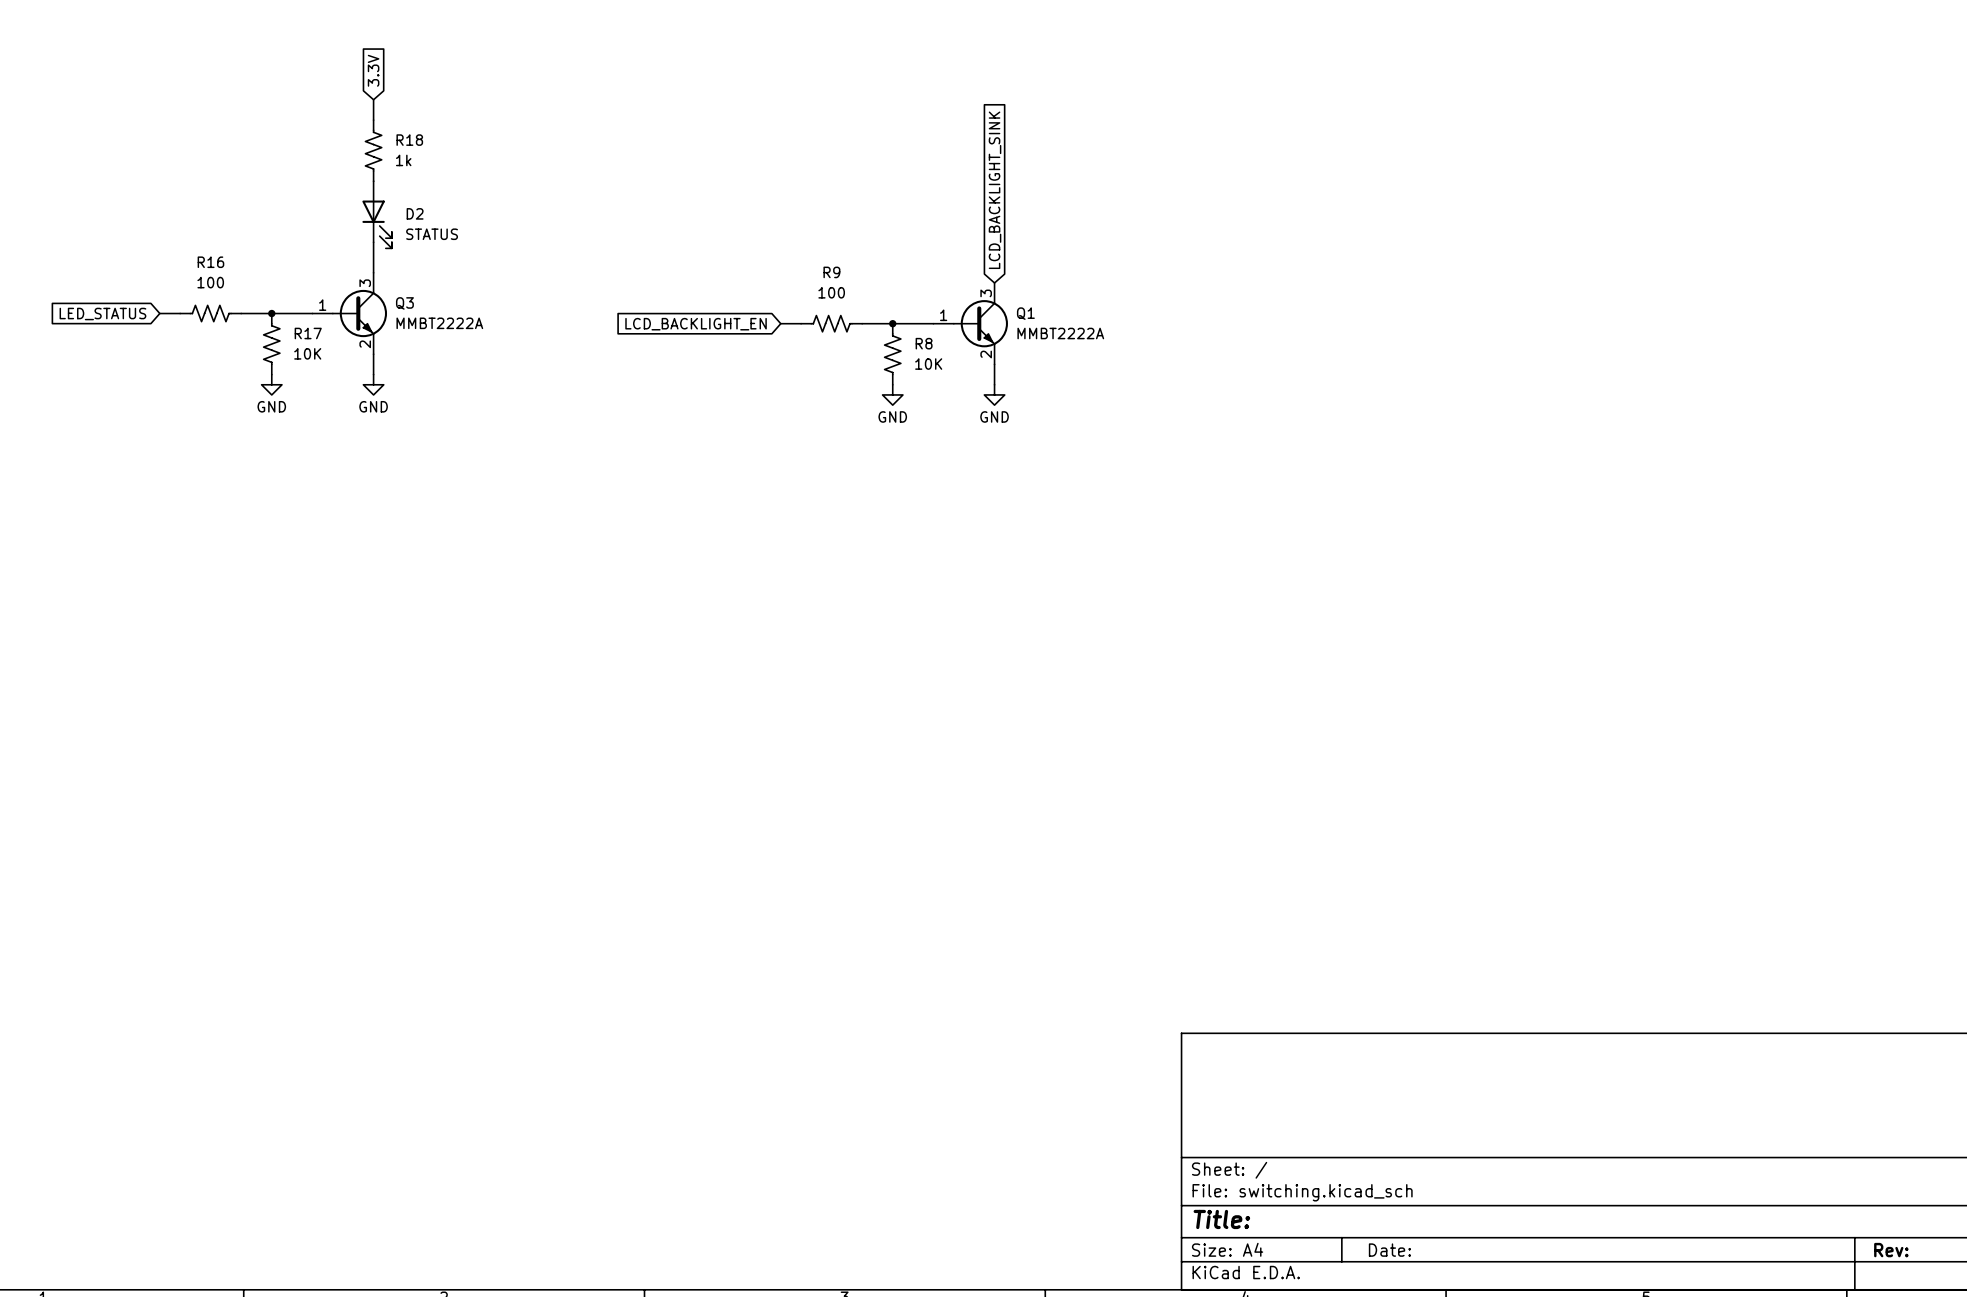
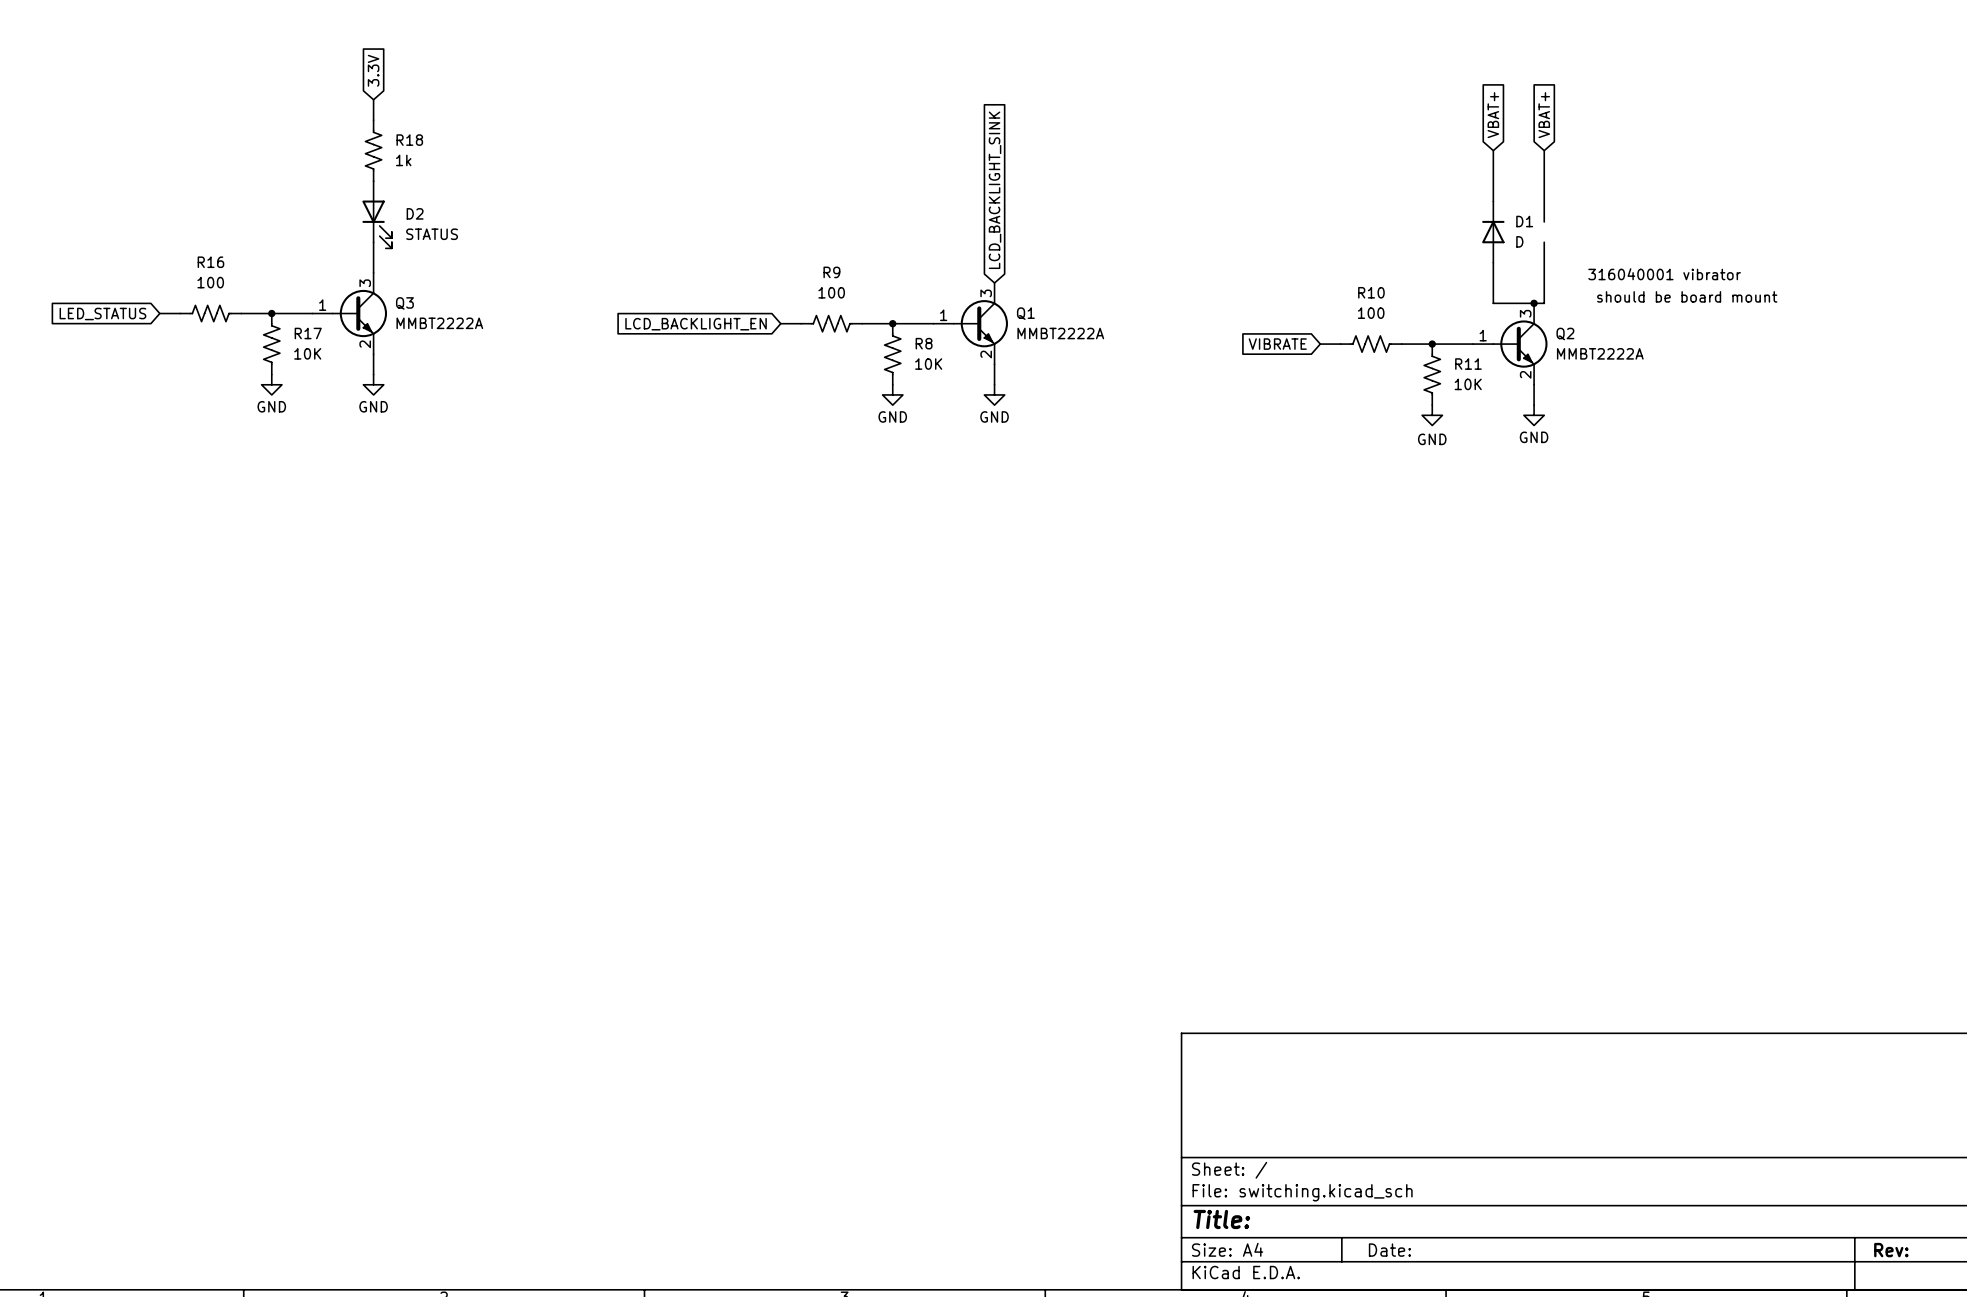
global label: none -> VBAT+ (1493, 115)
global label: none -> VBAT+ (1544, 115)
wire: none -> (1493, 150) (1493, 201)
wire: none -> (1544, 150) (1544, 221)
D1: none -> D (1493, 232)
wire: none -> (1544, 242) (1544, 303) (1493, 303) (1493, 262)
text: none -> 316040001 vibrator (1664, 274)
text: none -> should be board mount (1687, 296)
junction: none -> (1534, 303)
global label: none -> VIBRATE (1277, 344)
wire: none -> (1320, 344) (1340, 344)
R10: none -> 100 (1371, 344)
wire: none -> (1401, 344) (1472, 344)
junction: none -> (1432, 344)
Q2: none -> MMBT2222A (1510, 344)
R11: none -> 10K (1432, 374)
wire: none -> (1534, 384) (1534, 405)
power symbol: none -> GND (1432, 415)
power symbol: none -> GND (1534, 415)

